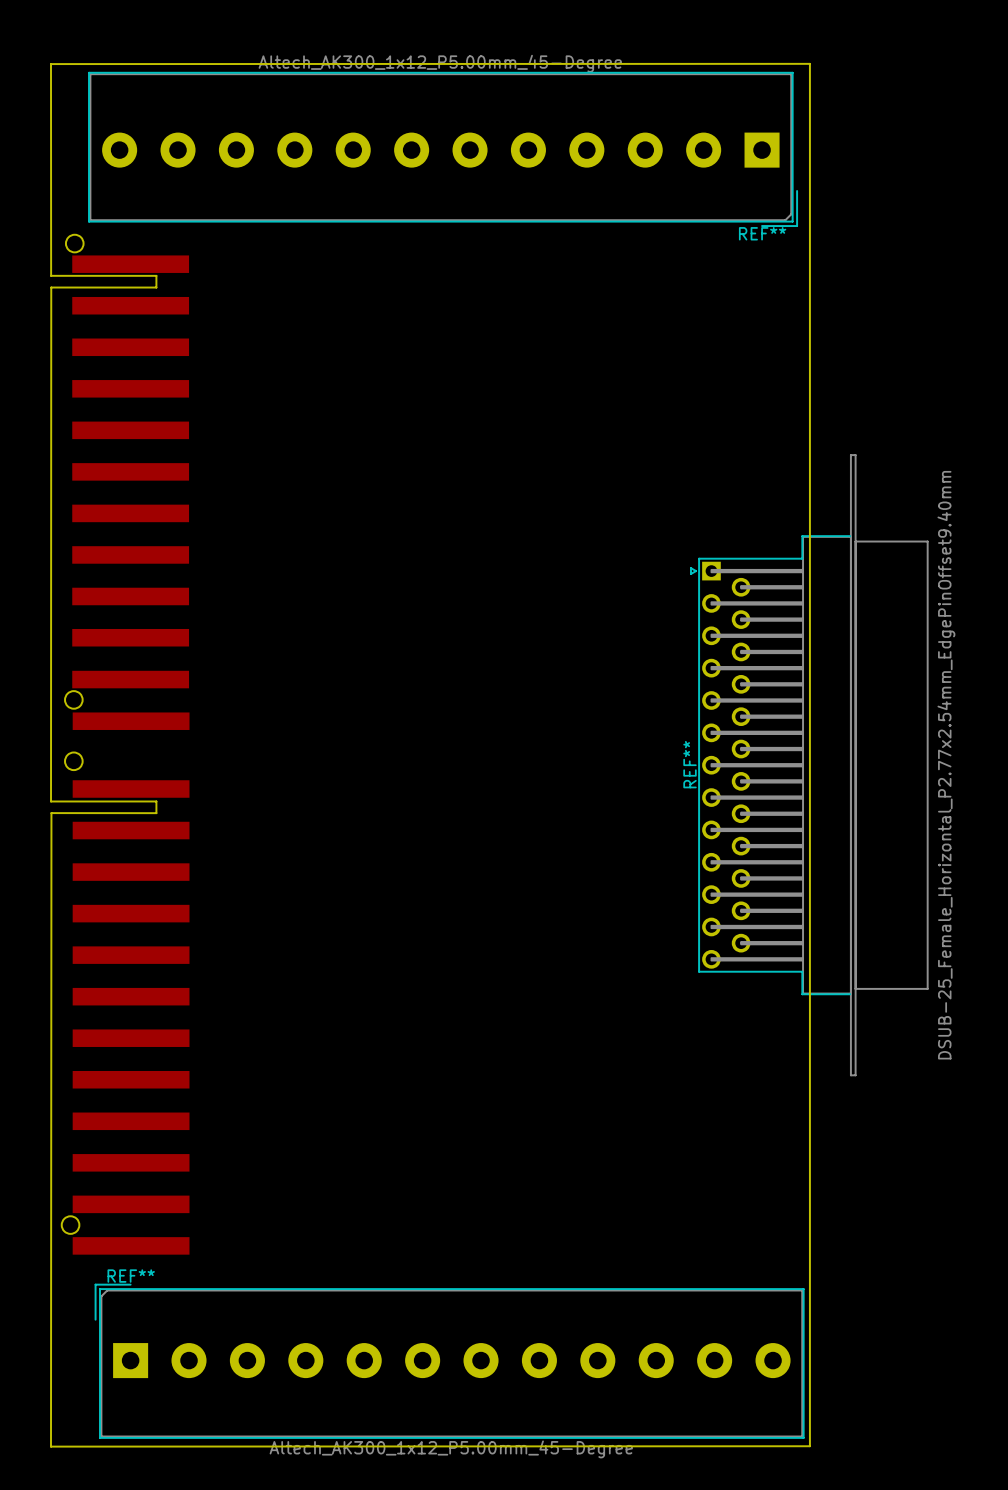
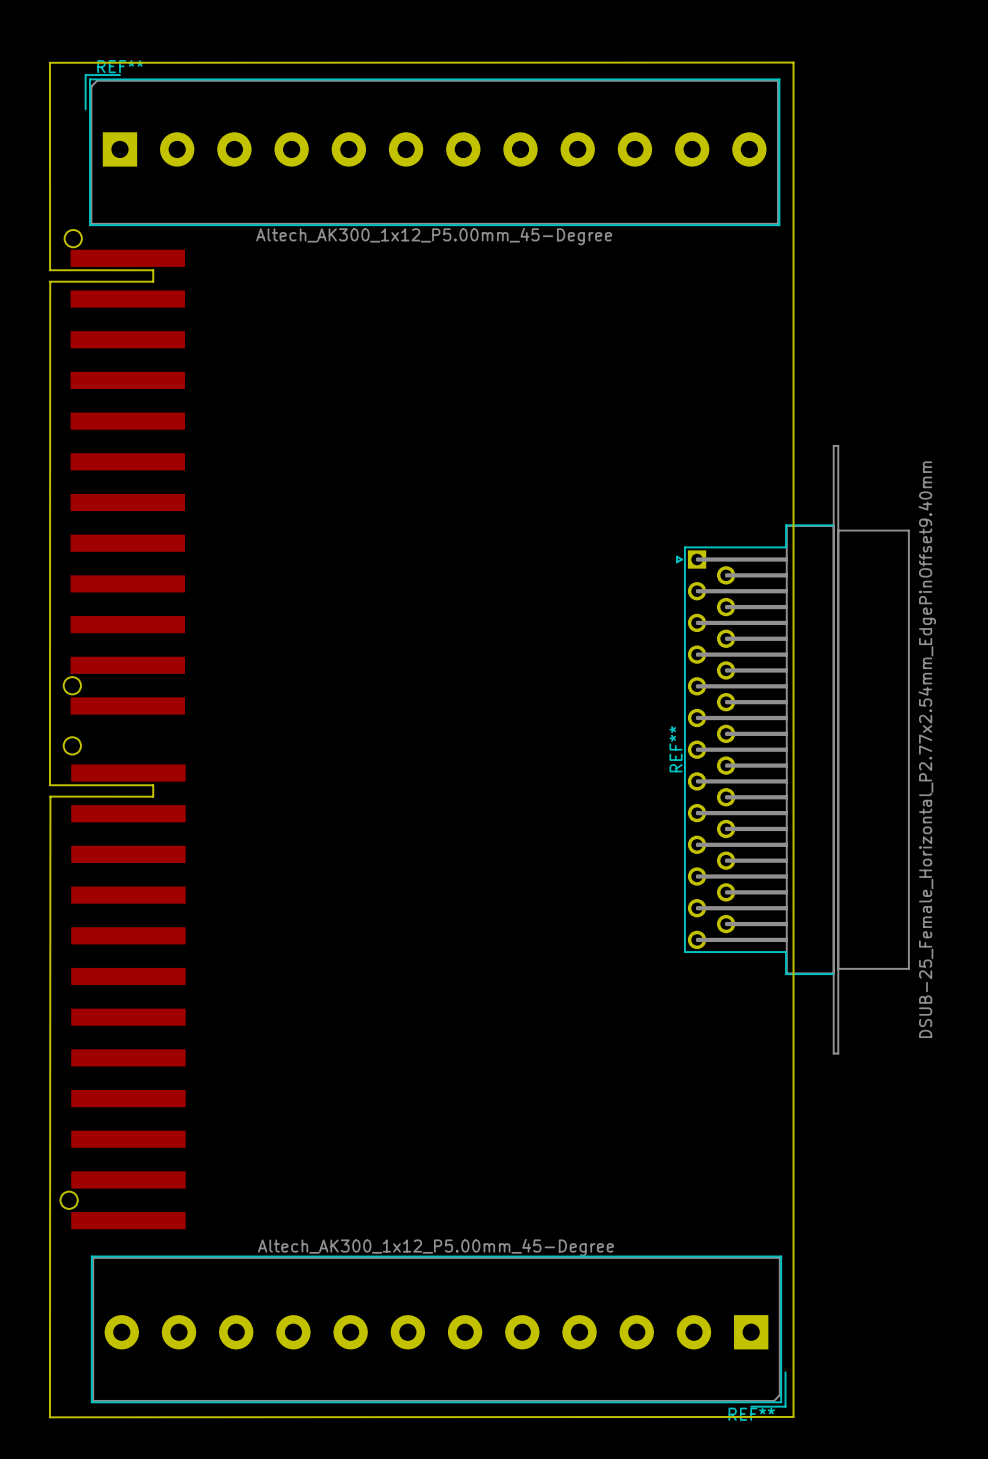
REF** rotation: 0° (443, 149) -> 180° (432, 150)
part: (130, 264) -> none
part: (130, 305) -> none
part: (130, 347) -> none
part: (130, 388) -> none
part: (130, 430) -> none
part: (130, 471) -> none
part: none -> (127, 482)
part: (130, 513) -> none
part: (130, 554) -> none
part: (130, 596) -> none
part: (130, 679) -> none
part: (131, 721) -> none
REF** rotation: 0° (449, 1361) -> 180° (438, 1331)

